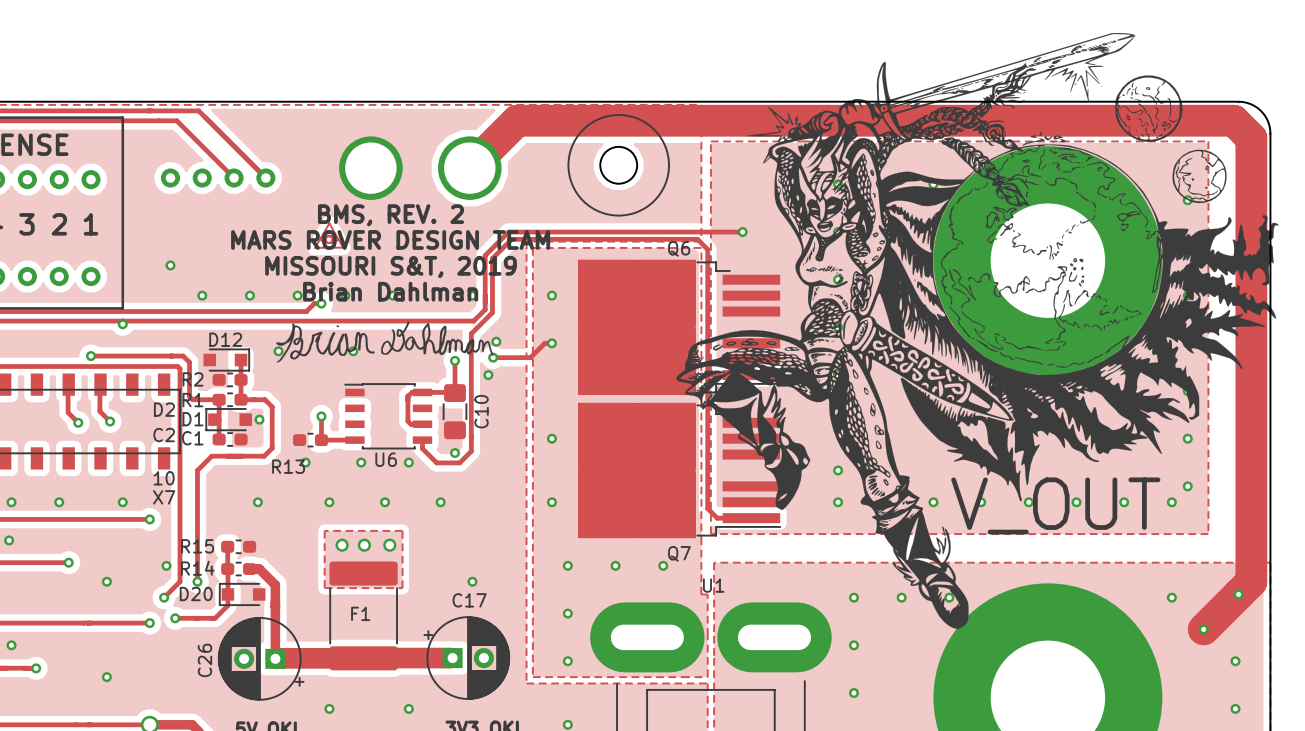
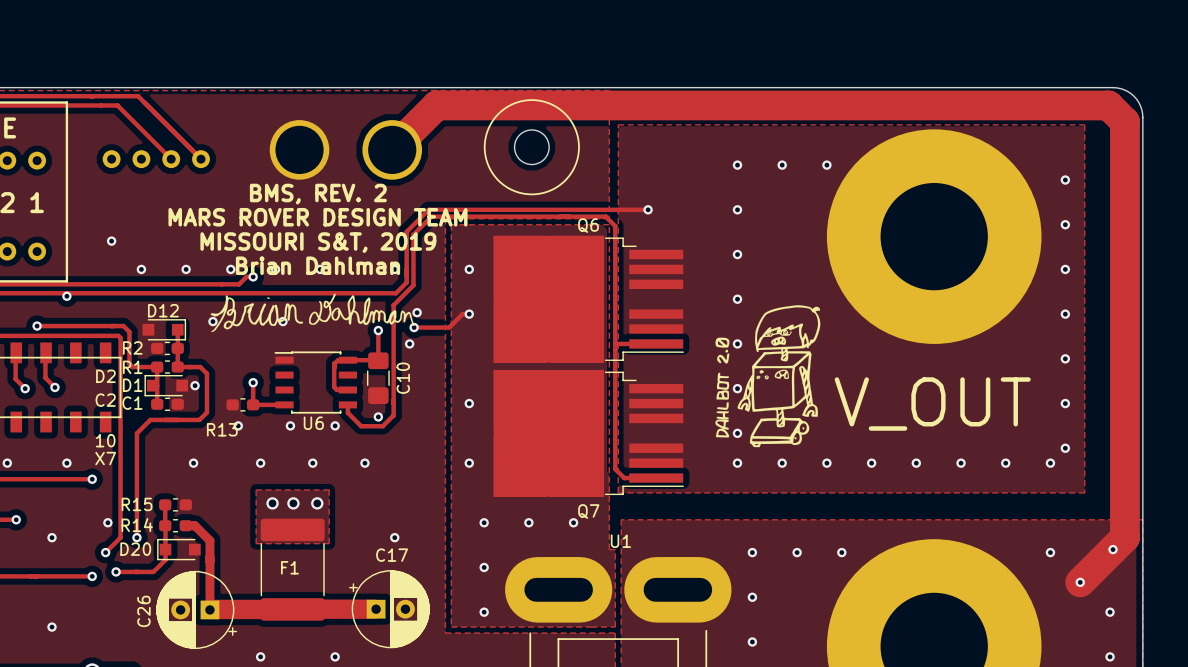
drawing: [676, 33, 1279, 629] -> none
drawing: [314, 222, 345, 249] -> none
drawing: none -> [715, 305, 821, 448]
text position: V_OUT (1055, 505) -> V_OUT (932, 404)

